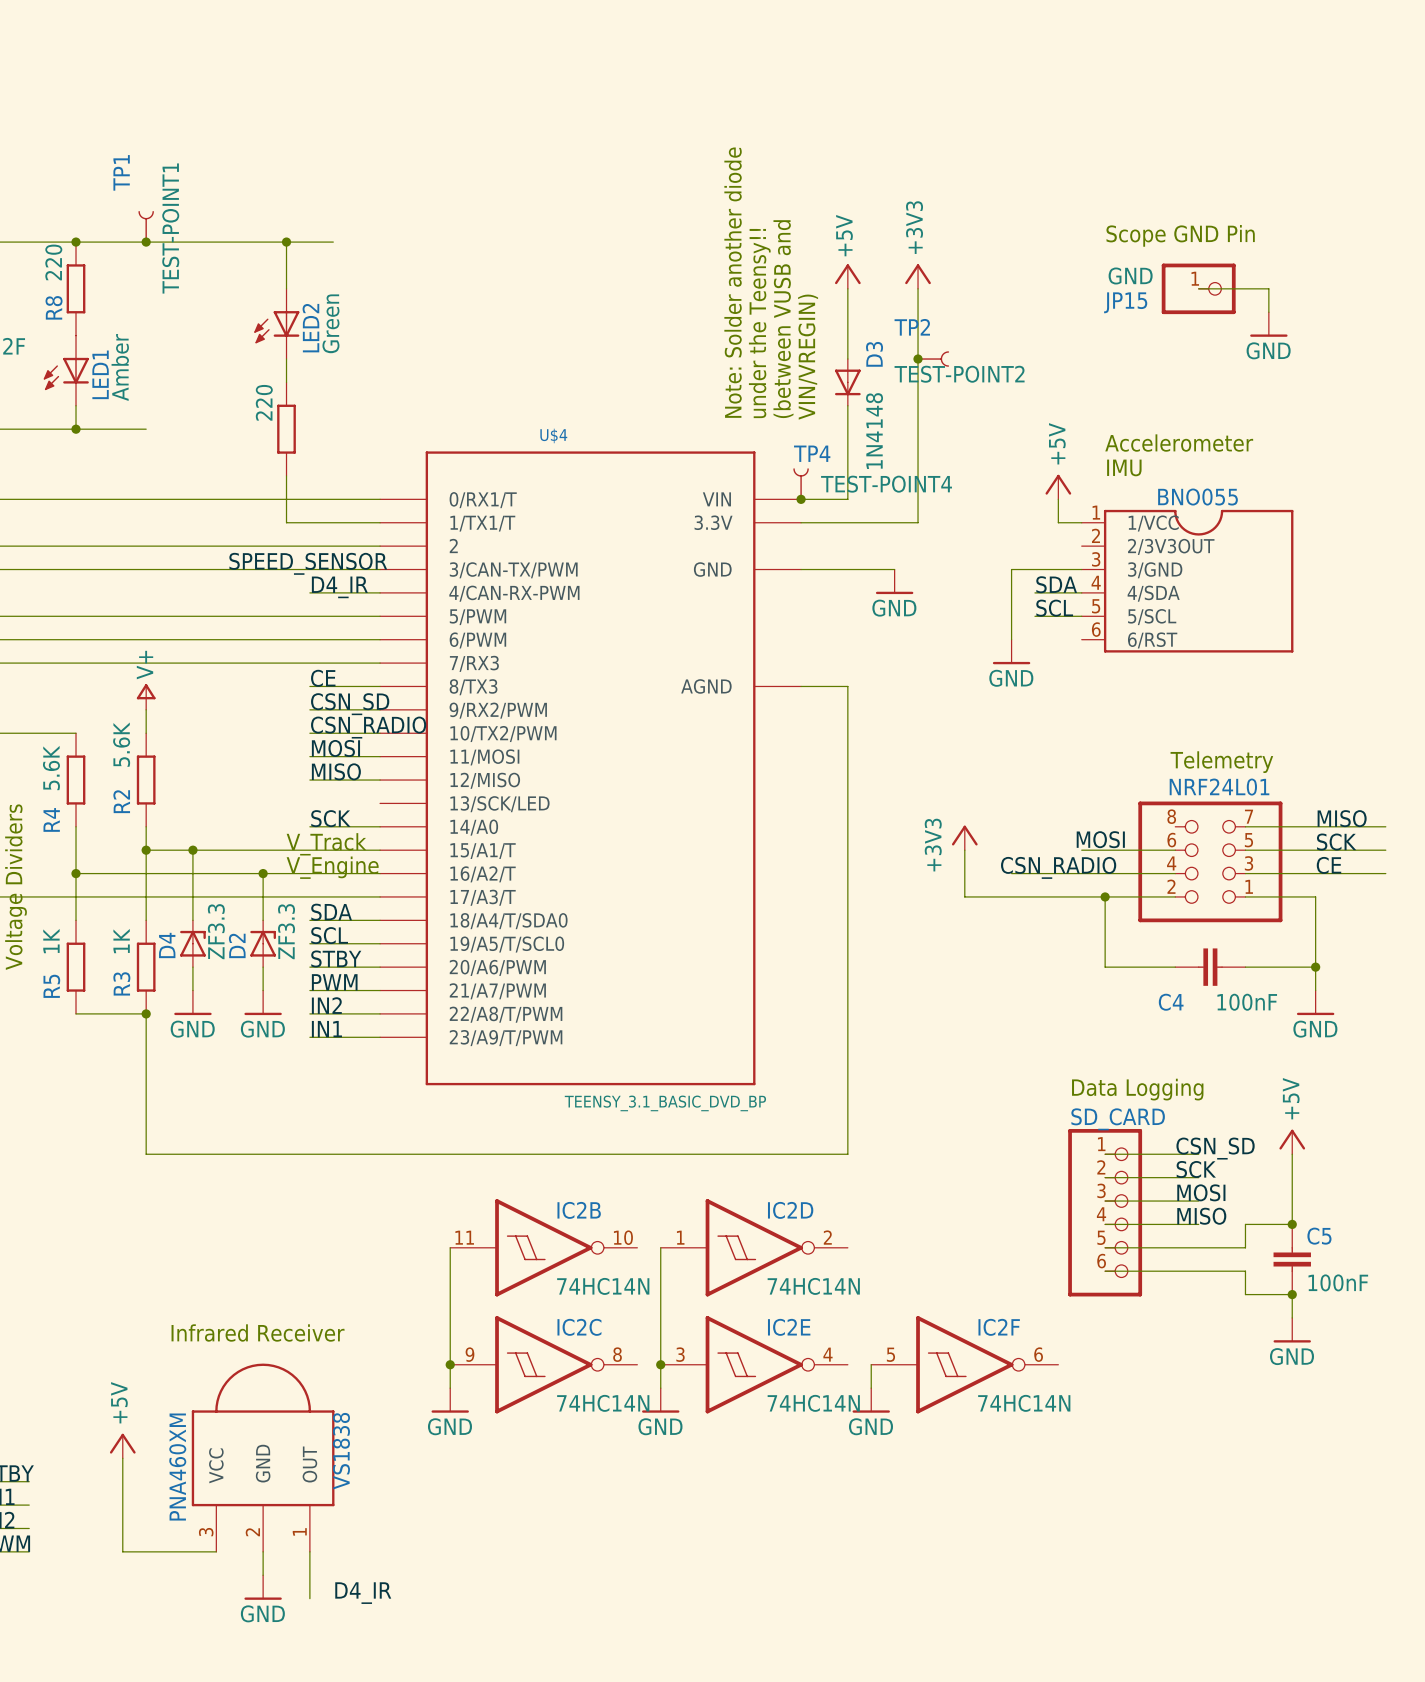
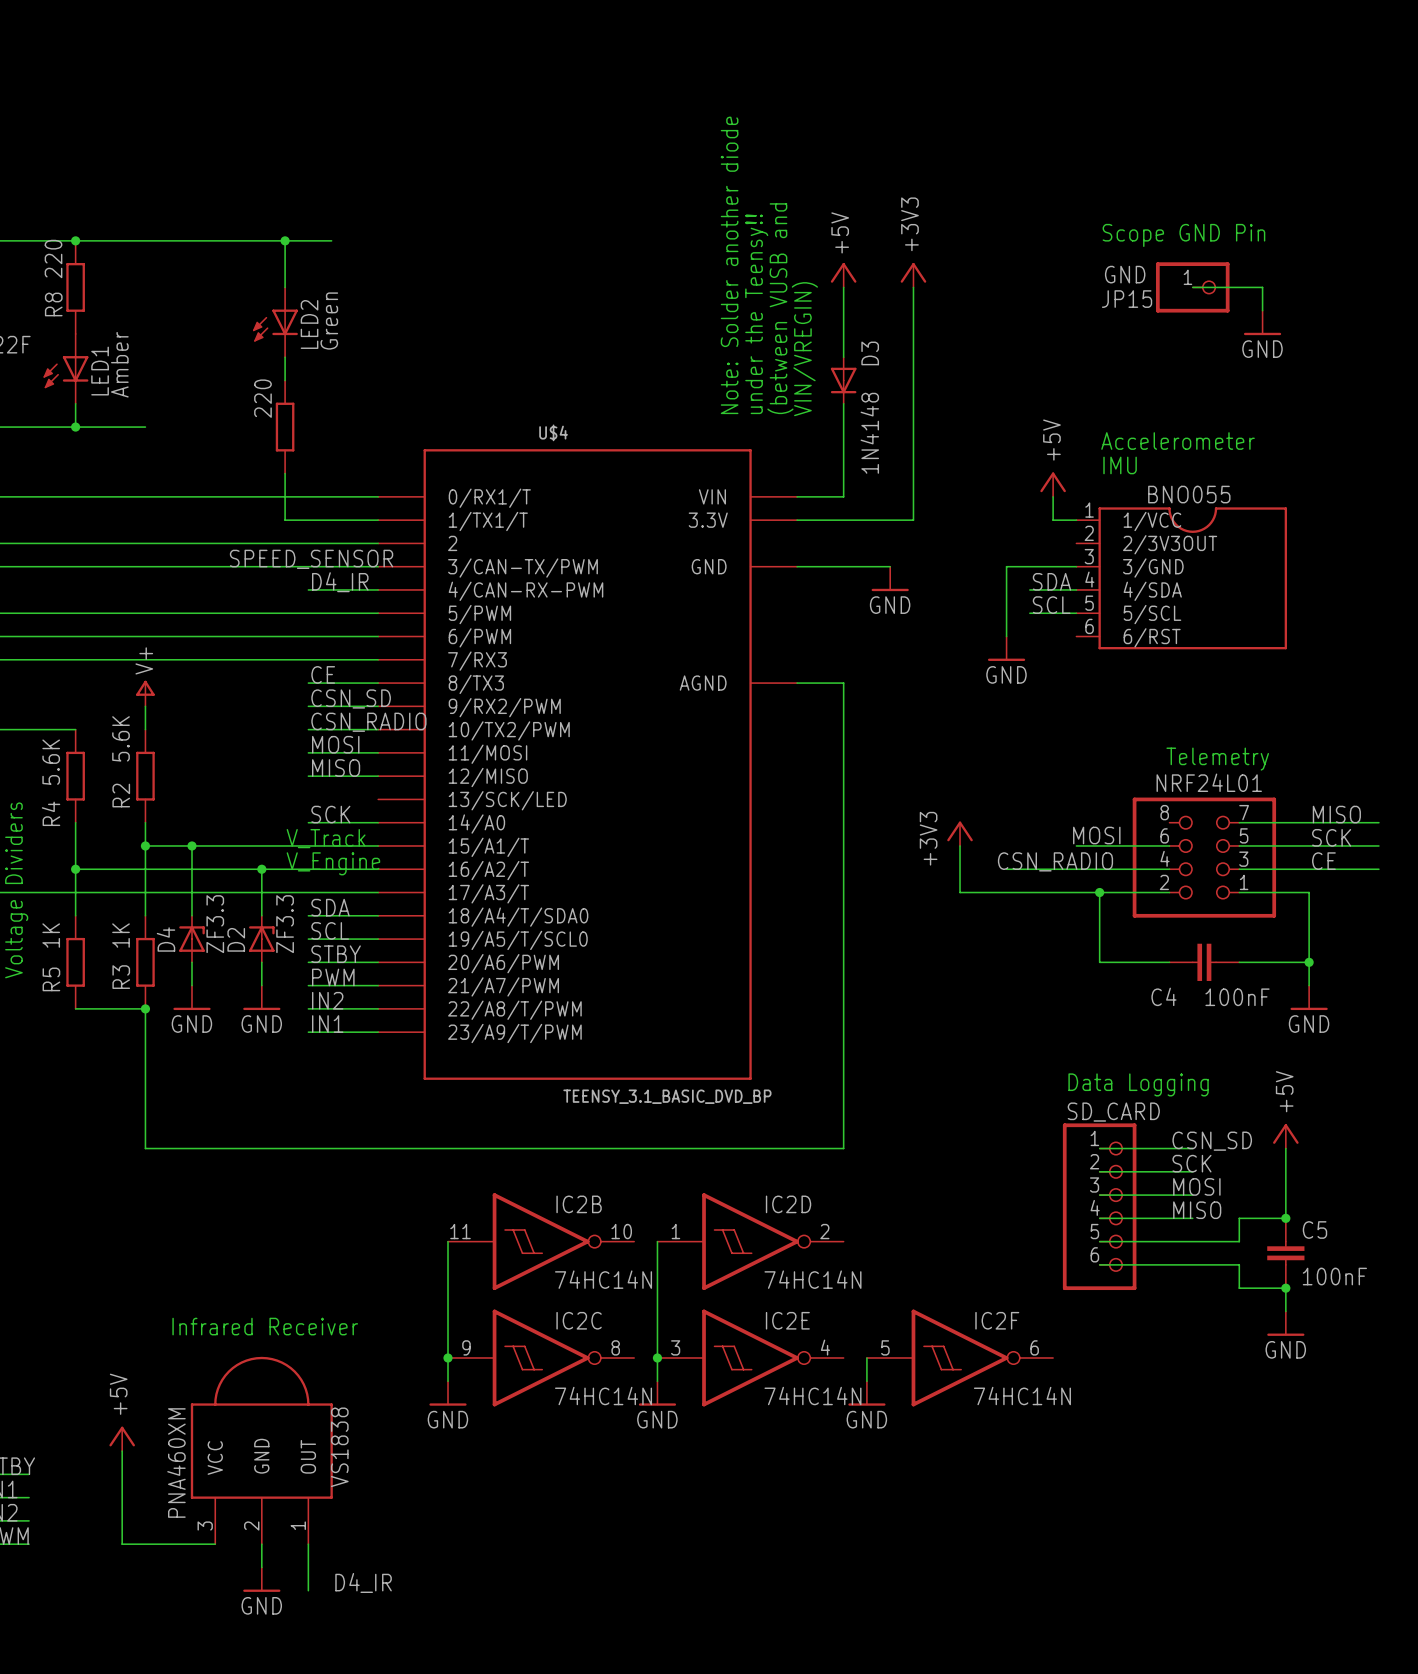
TP1: TEST-POINT1 (146, 226) -> none
junction: (146, 242) -> none
junction: (918, 359) -> none
TP2: TEST-POINT2 (933, 359) -> none
TP4: TEST-POINT4 (801, 484) -> none
junction: (801, 499) -> none

